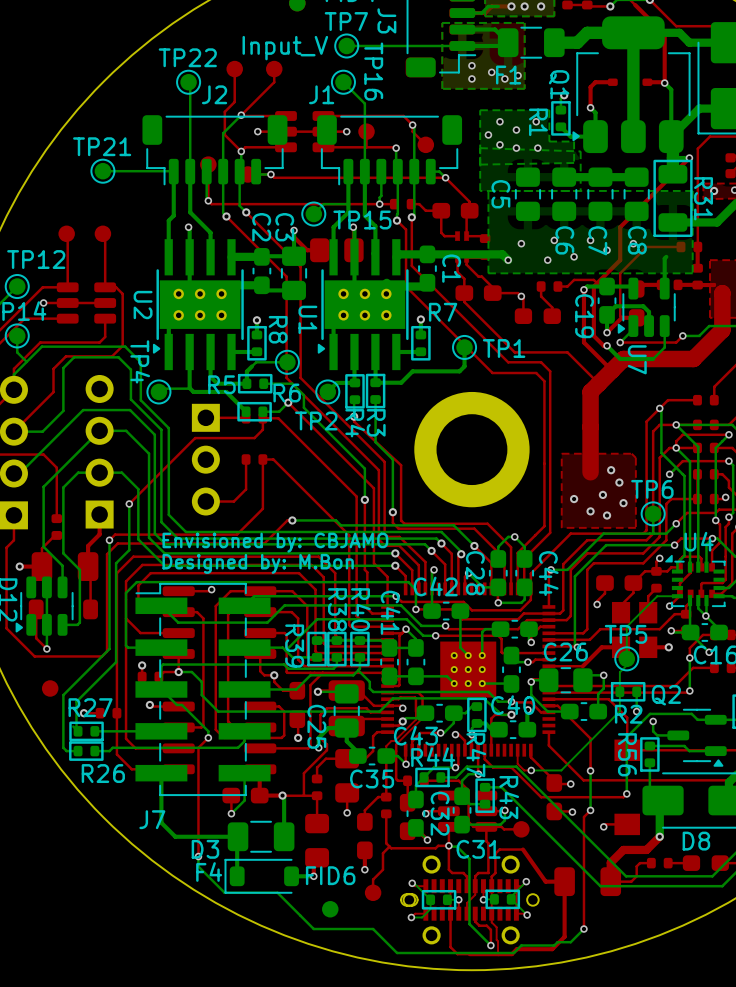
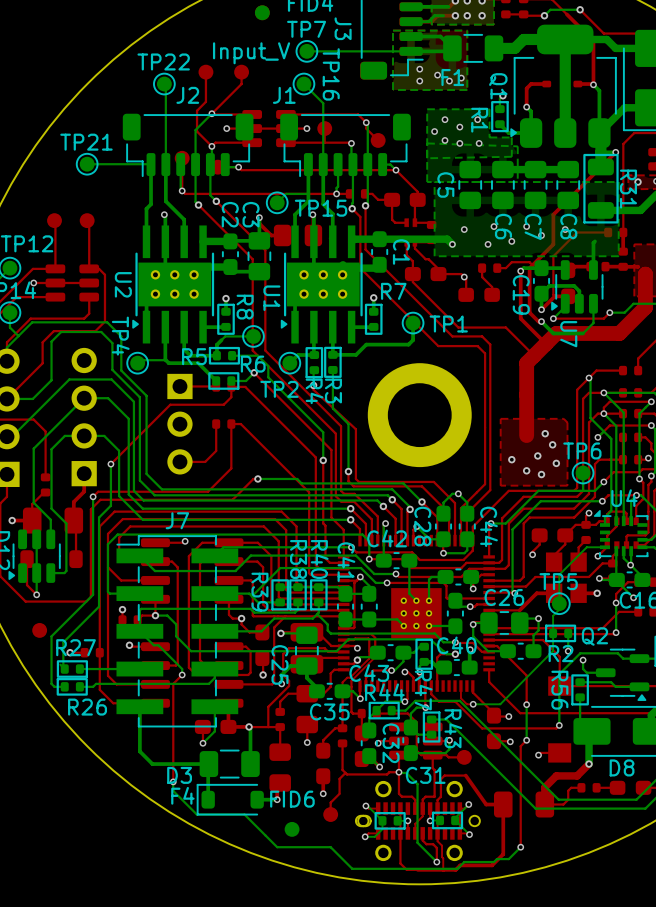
text: Envisioned by: CBJAMO (275, 542) -> none
text: Designed by: M.Bon (258, 563) -> none
J7 name position: J7 (152, 819) -> J7 (177, 520)

